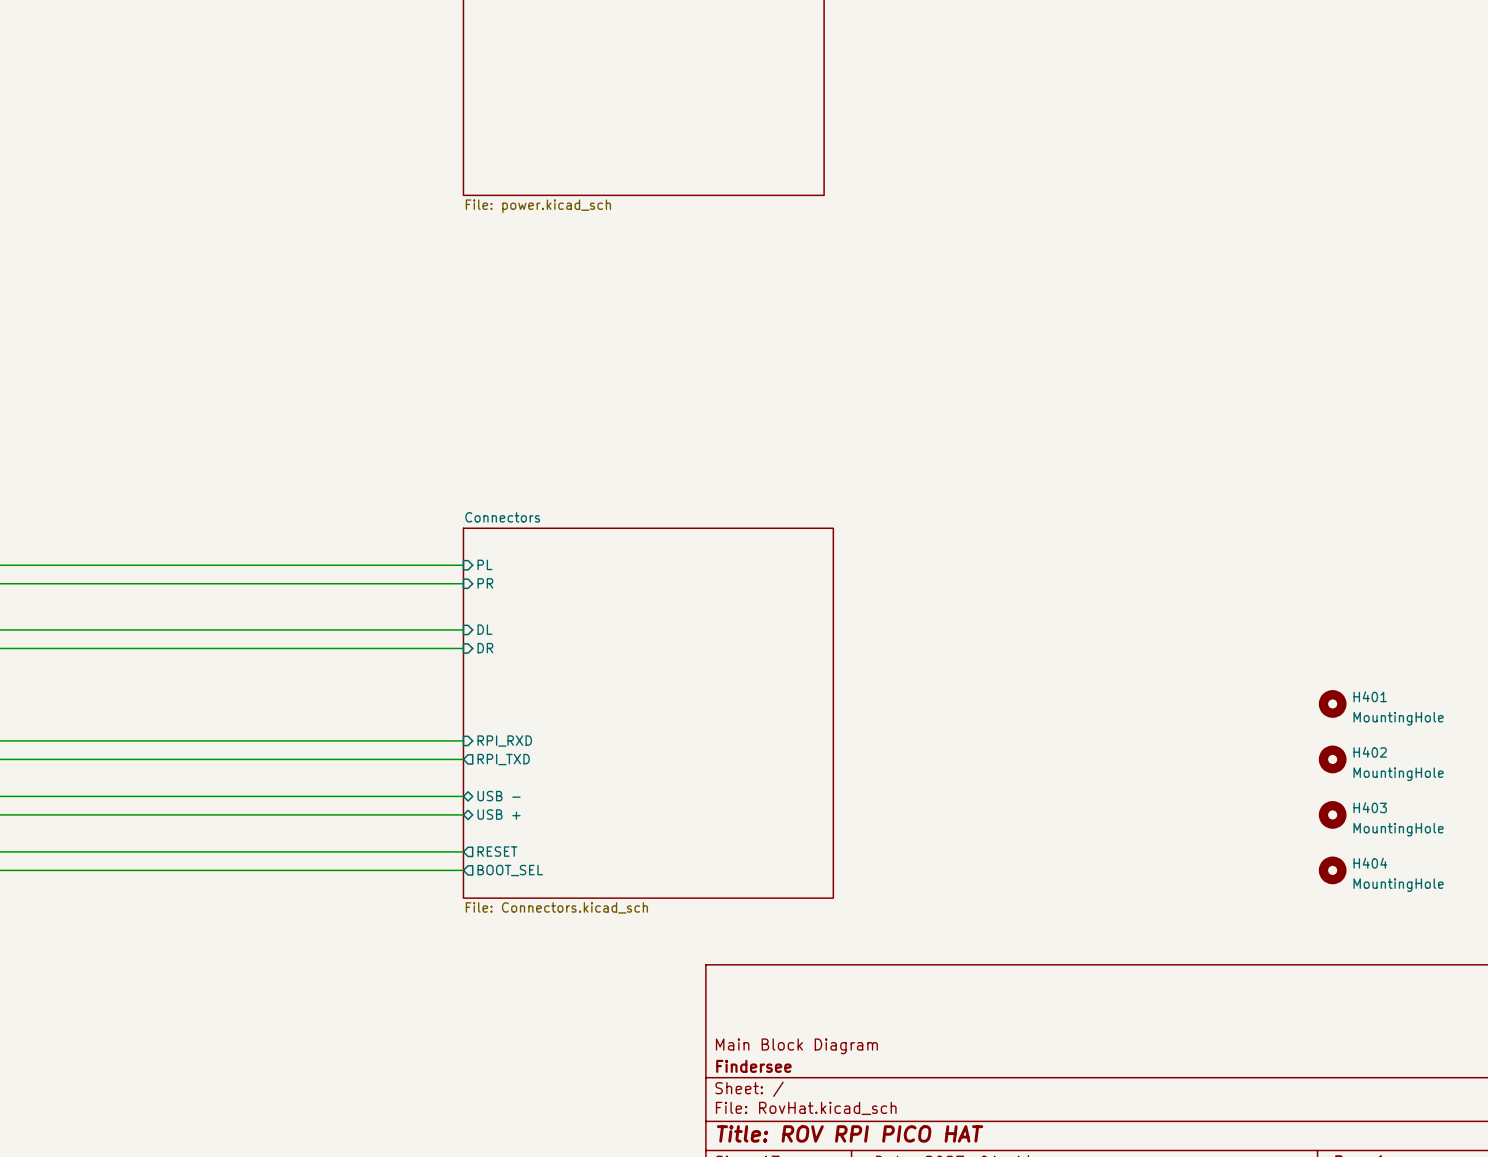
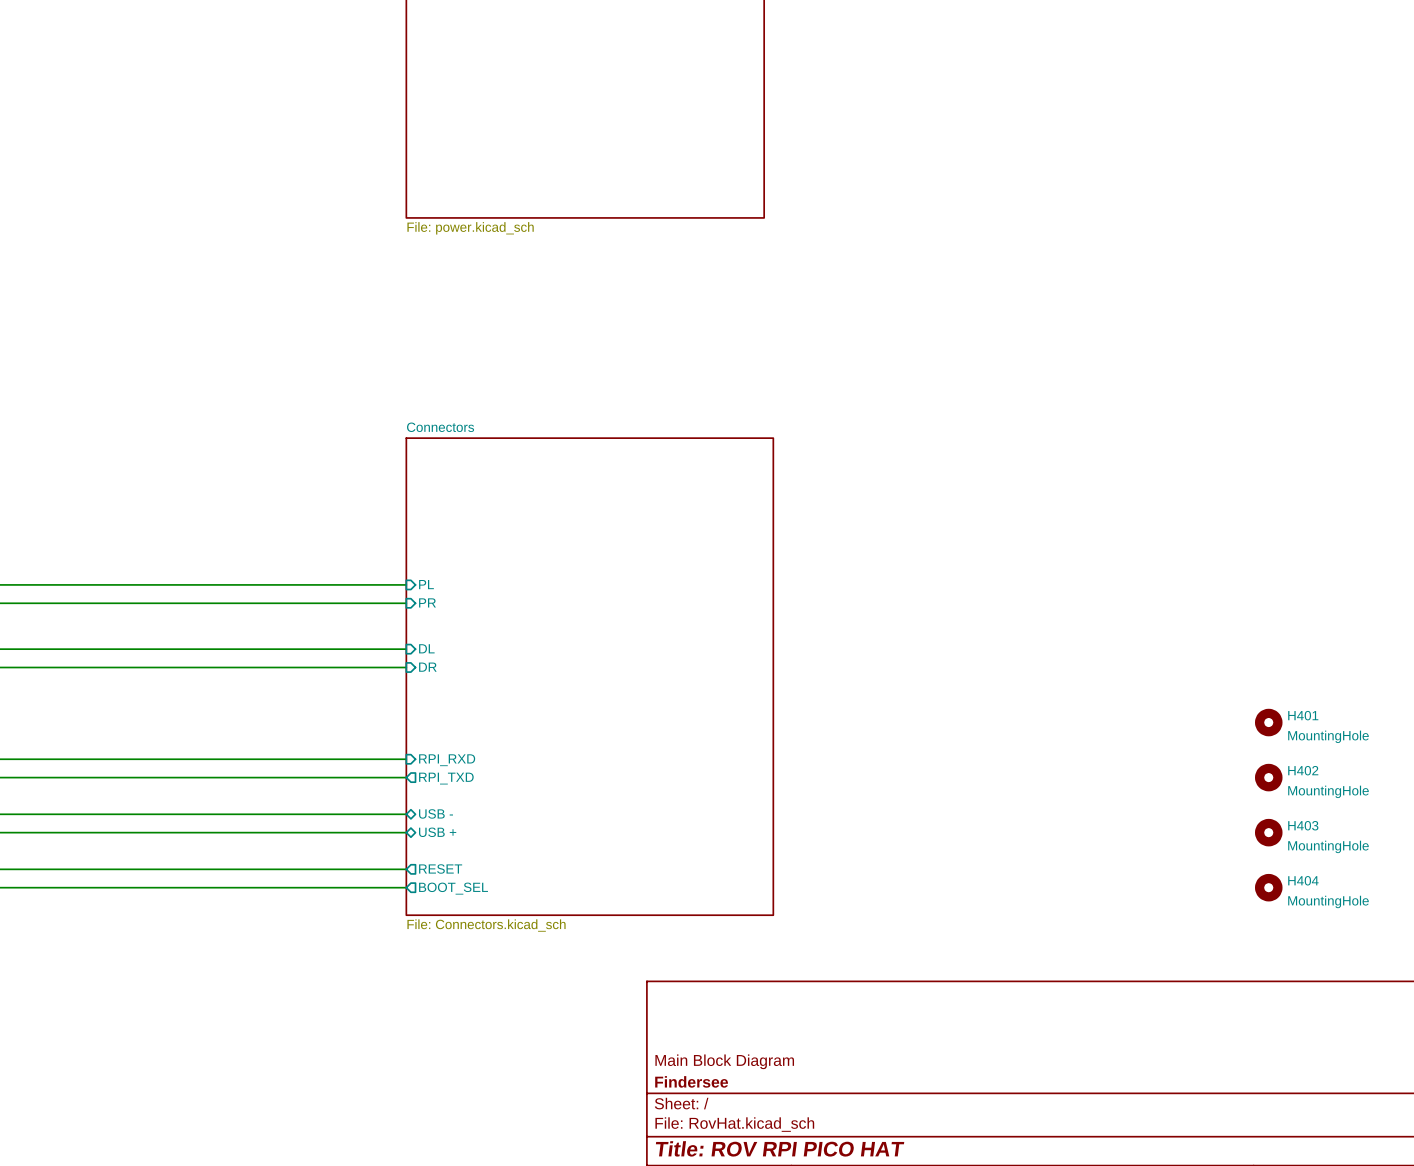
sheet Connectors: none -> File: Connectors.kicad_sch (589, 676)
sheet Connectors: File: Connectors.kicad_sch (648, 713) -> none

